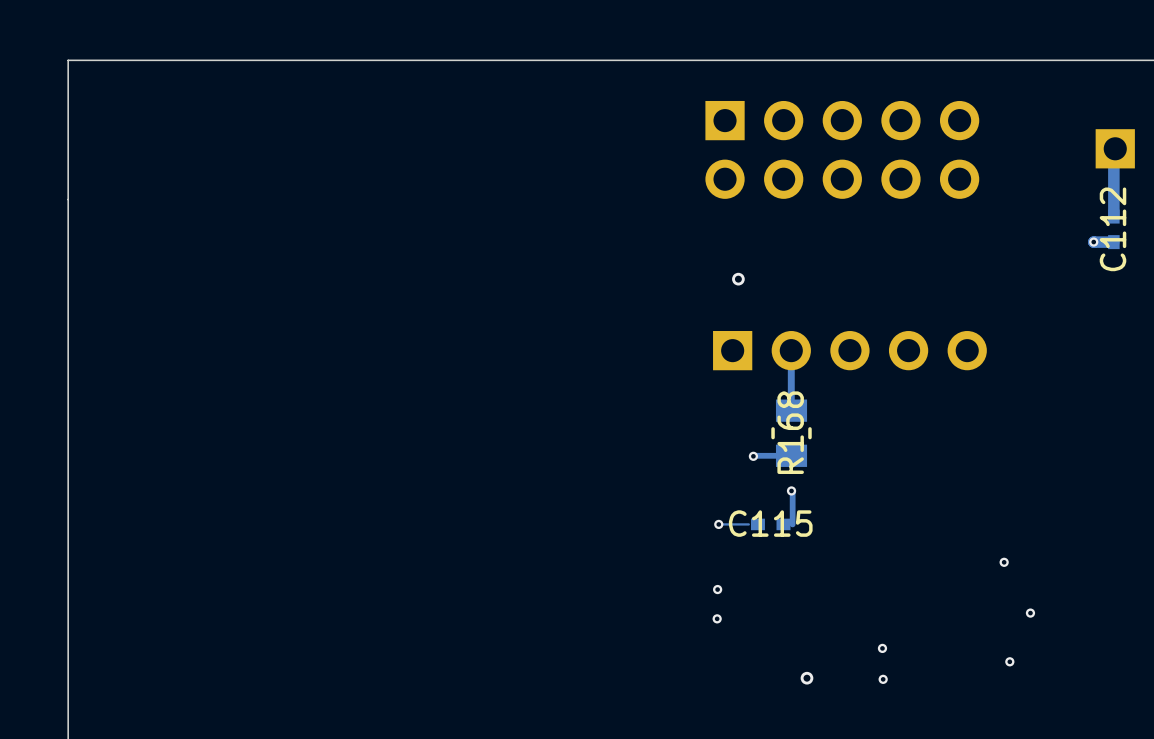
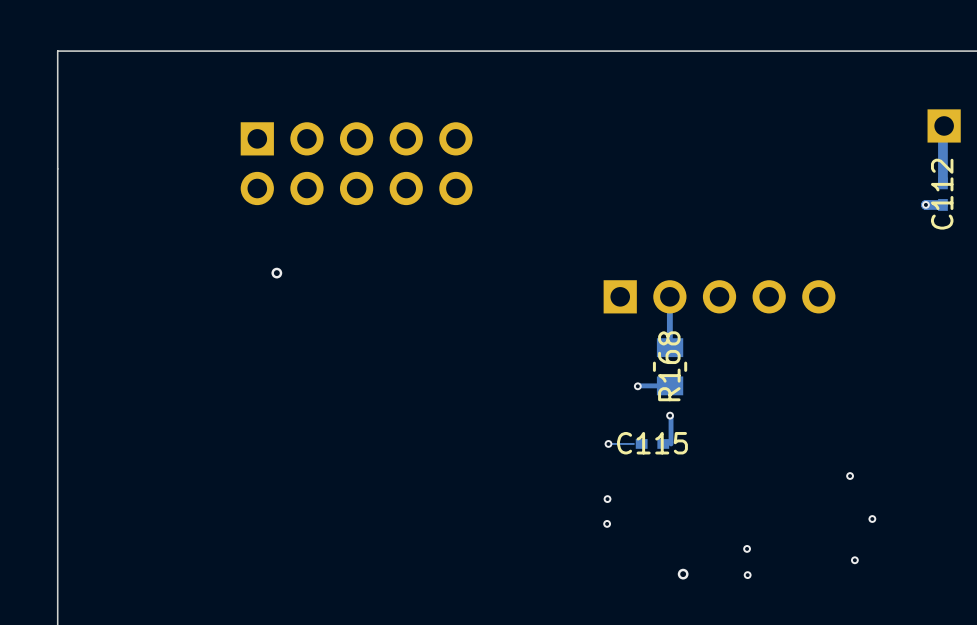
part position: (842, 149) -> (356, 163)
via: (738, 279) -> none
via: none -> (276, 273)

